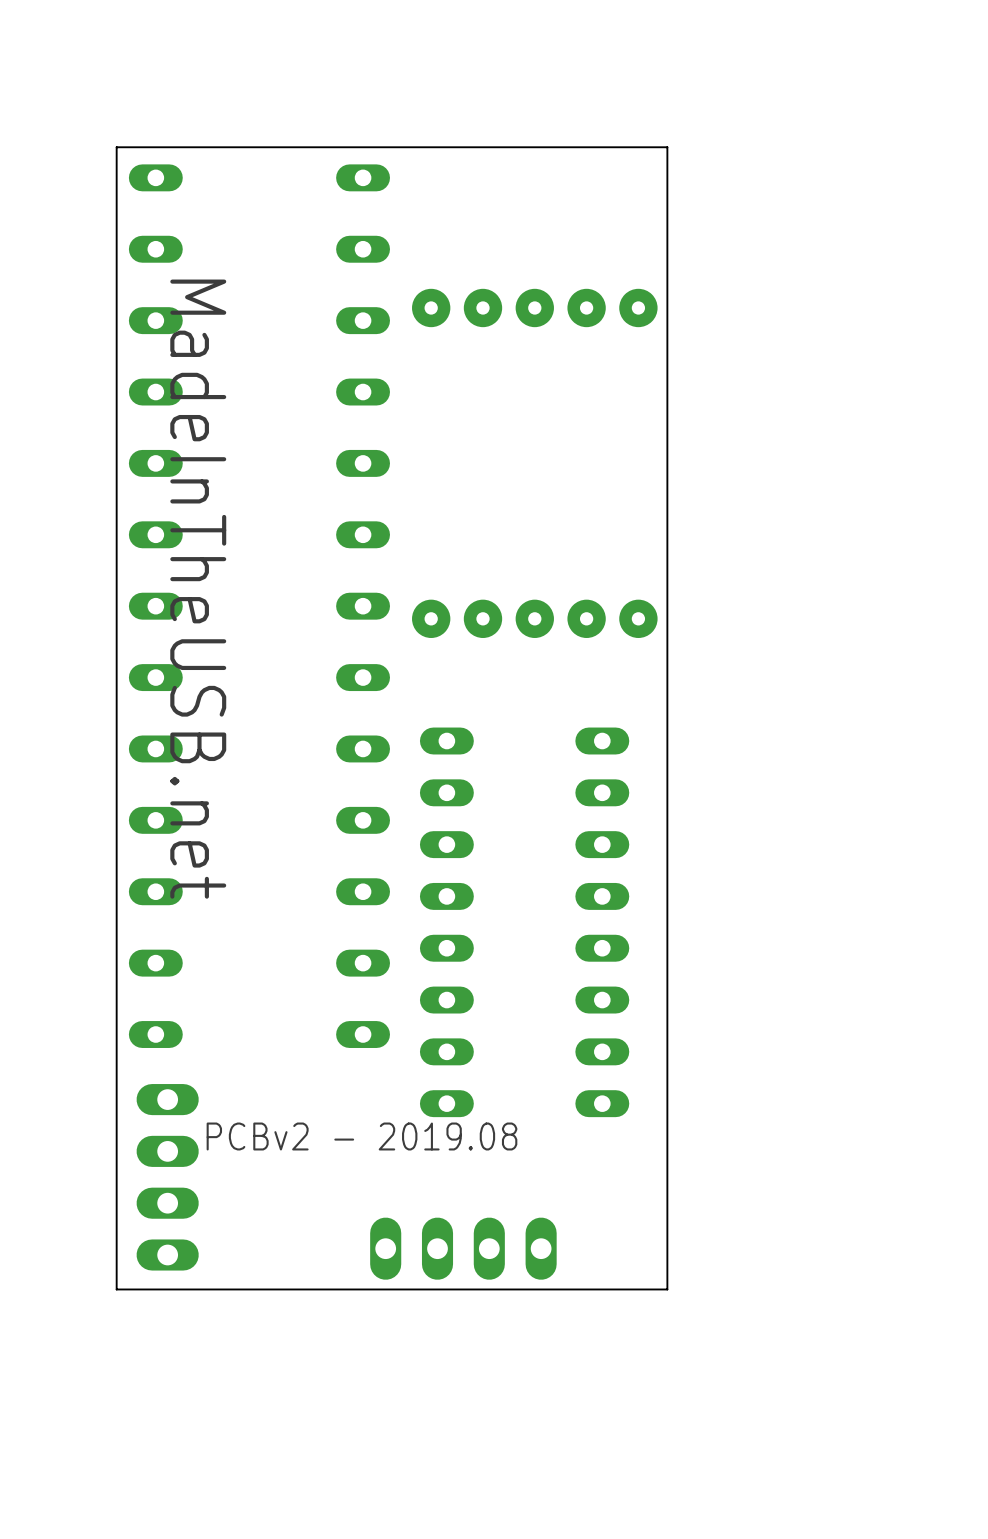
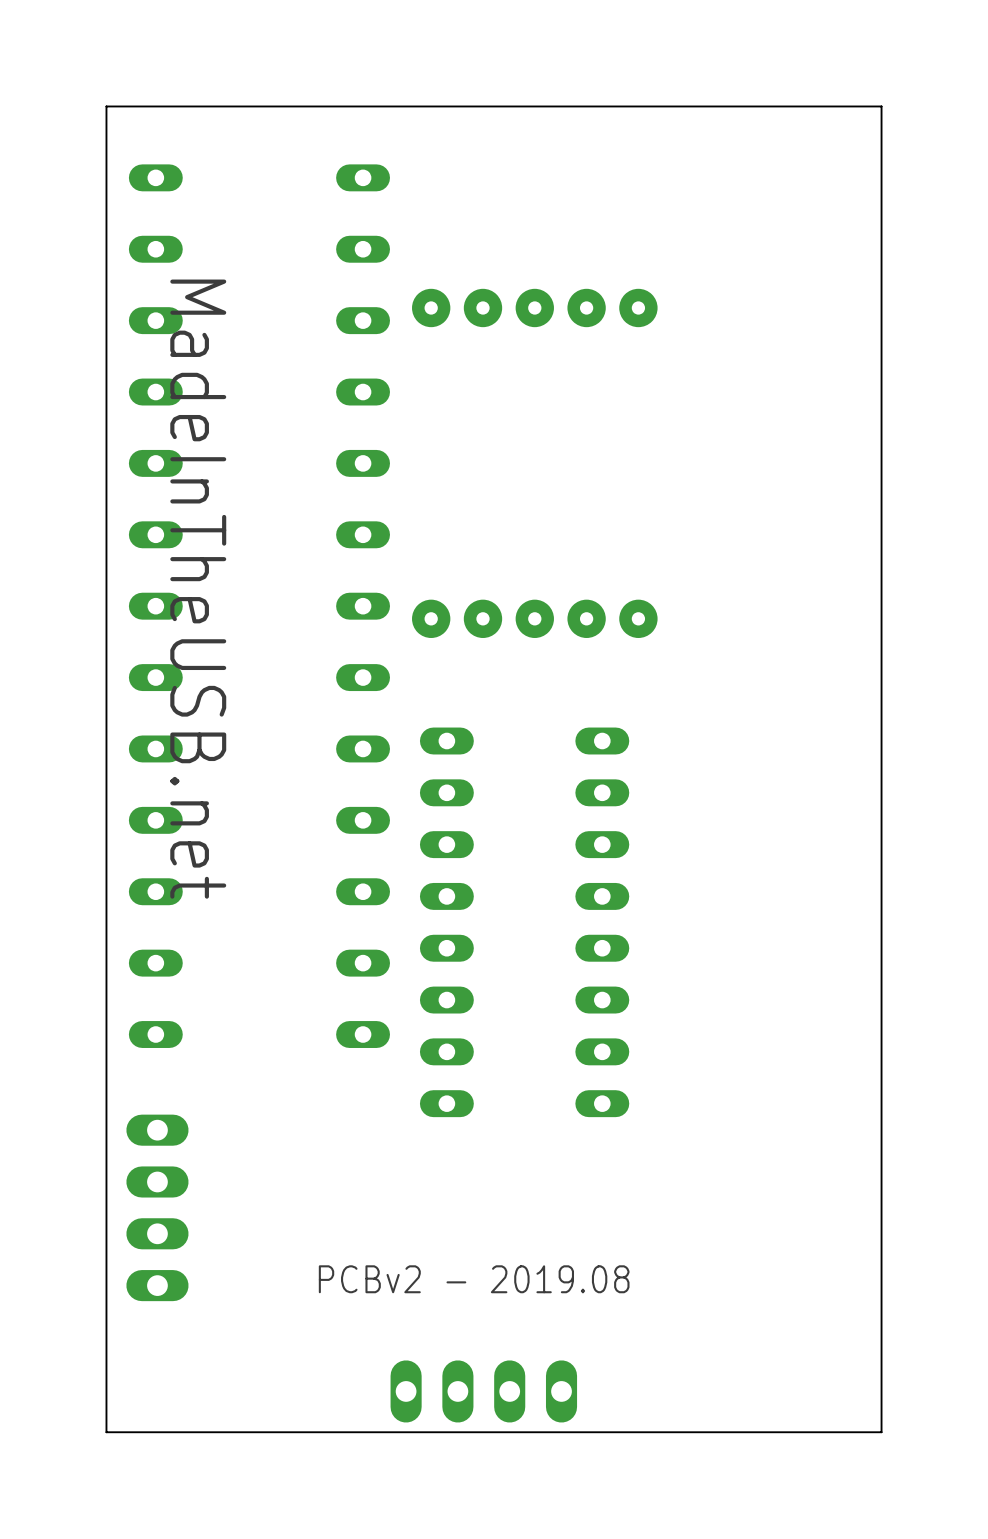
board edge: (667, 147) (116, 147) (116, 1289) (667, 1289) (667, 147) -> (881, 106) (881, 1432) (106, 1432) (106, 106) (881, 106)
text position: PCBv2 - 2019.08 (361, 1136) -> PCBv2 - 2019.08 (474, 1279)
part position: (167, 1177) -> (157, 1207)
part position: (463, 1248) -> (483, 1391)

